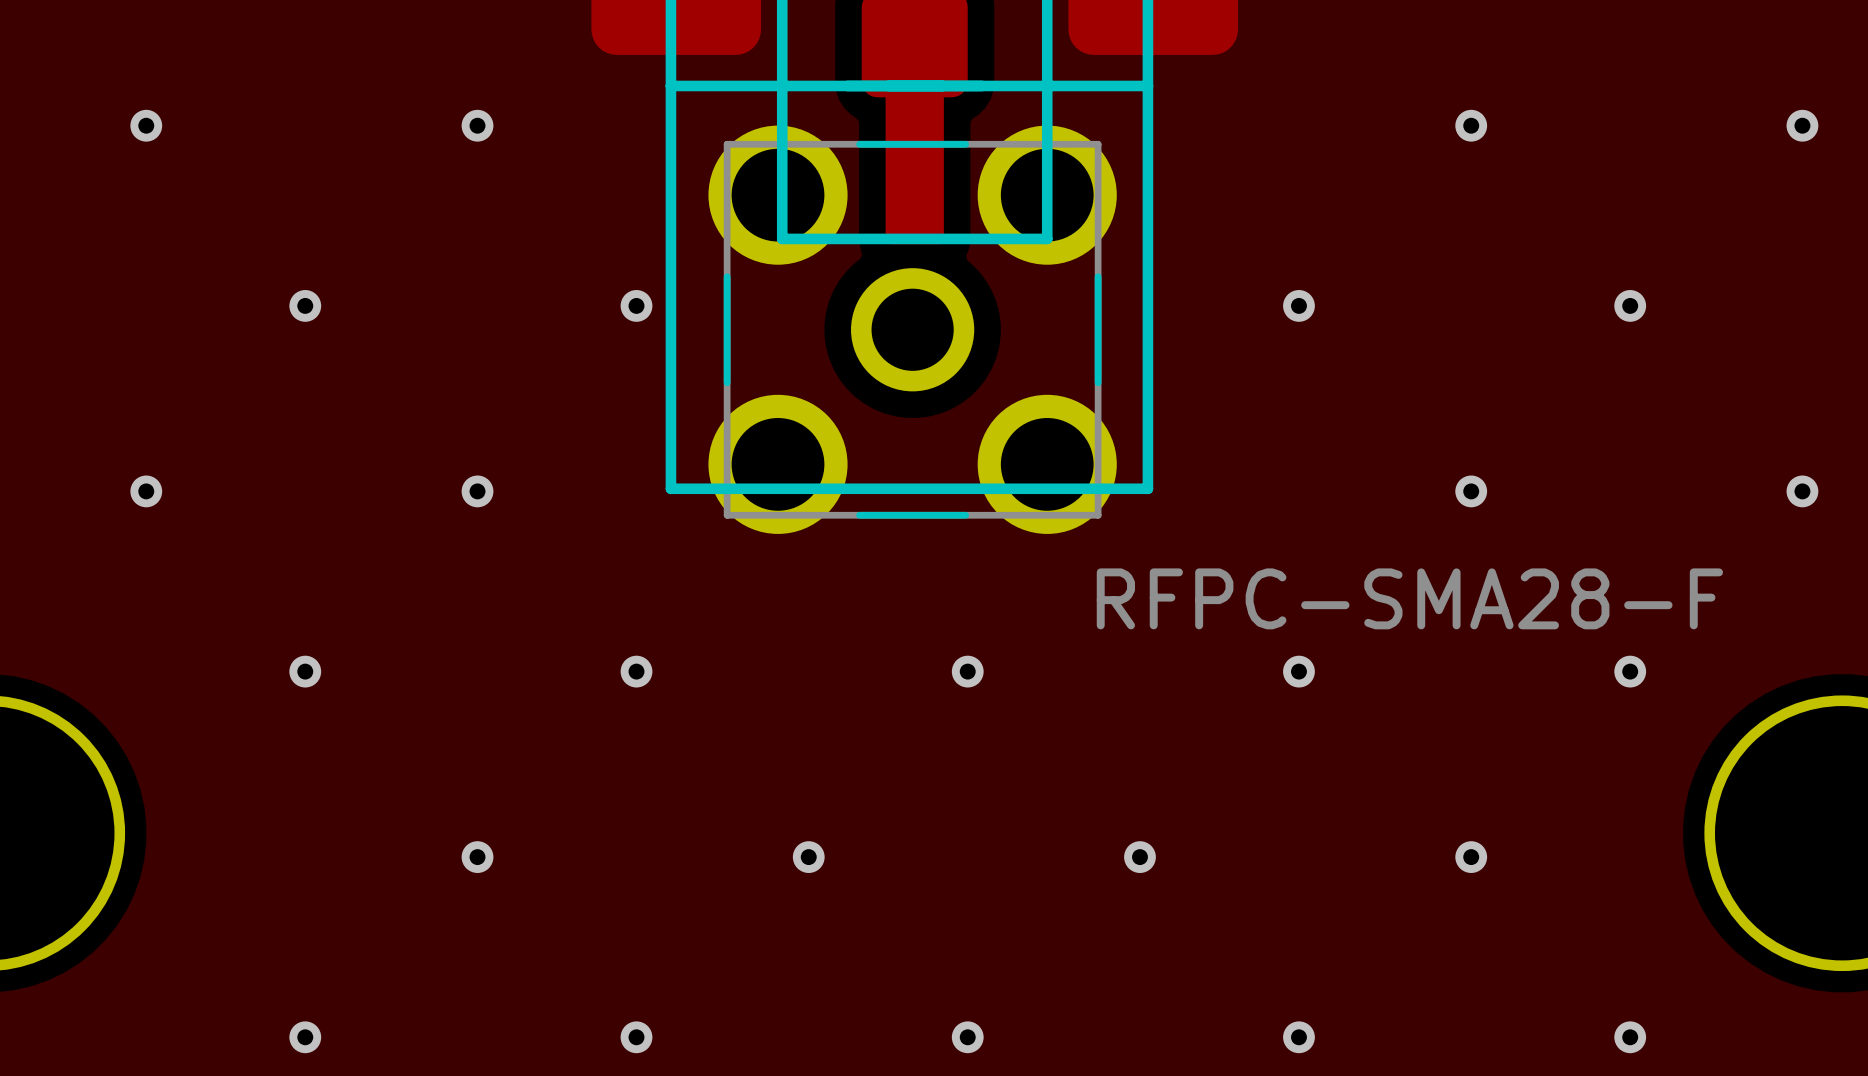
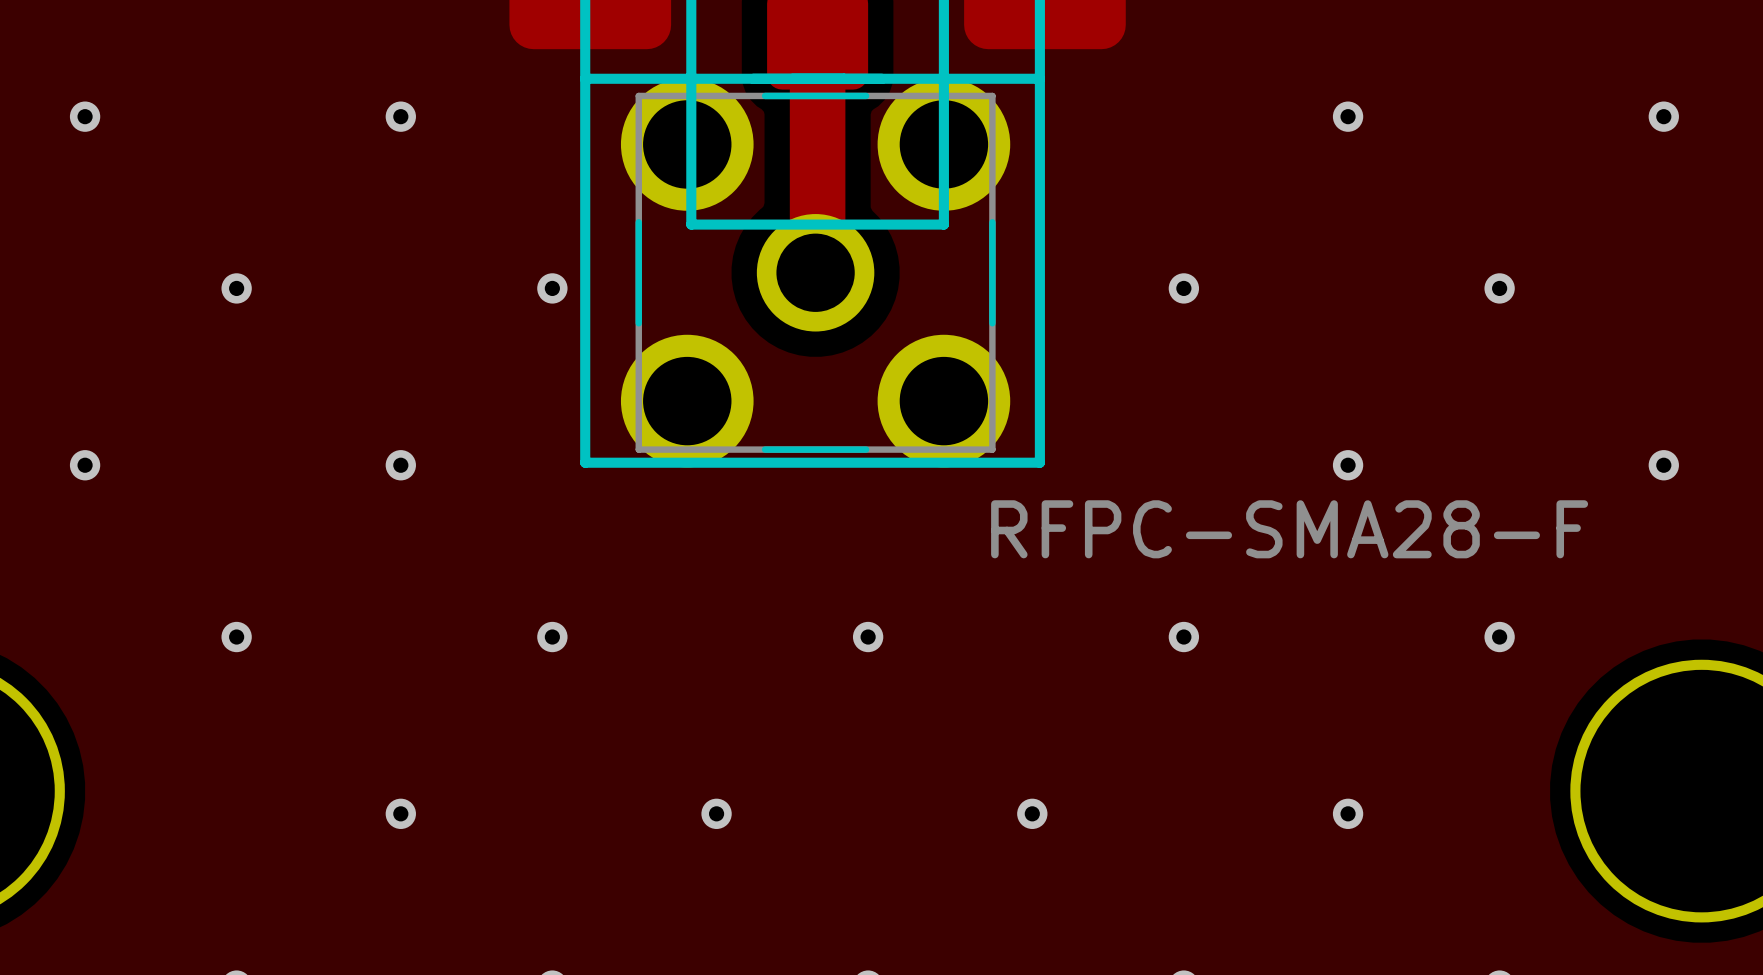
part position: (912, 329) -> (815, 272)

